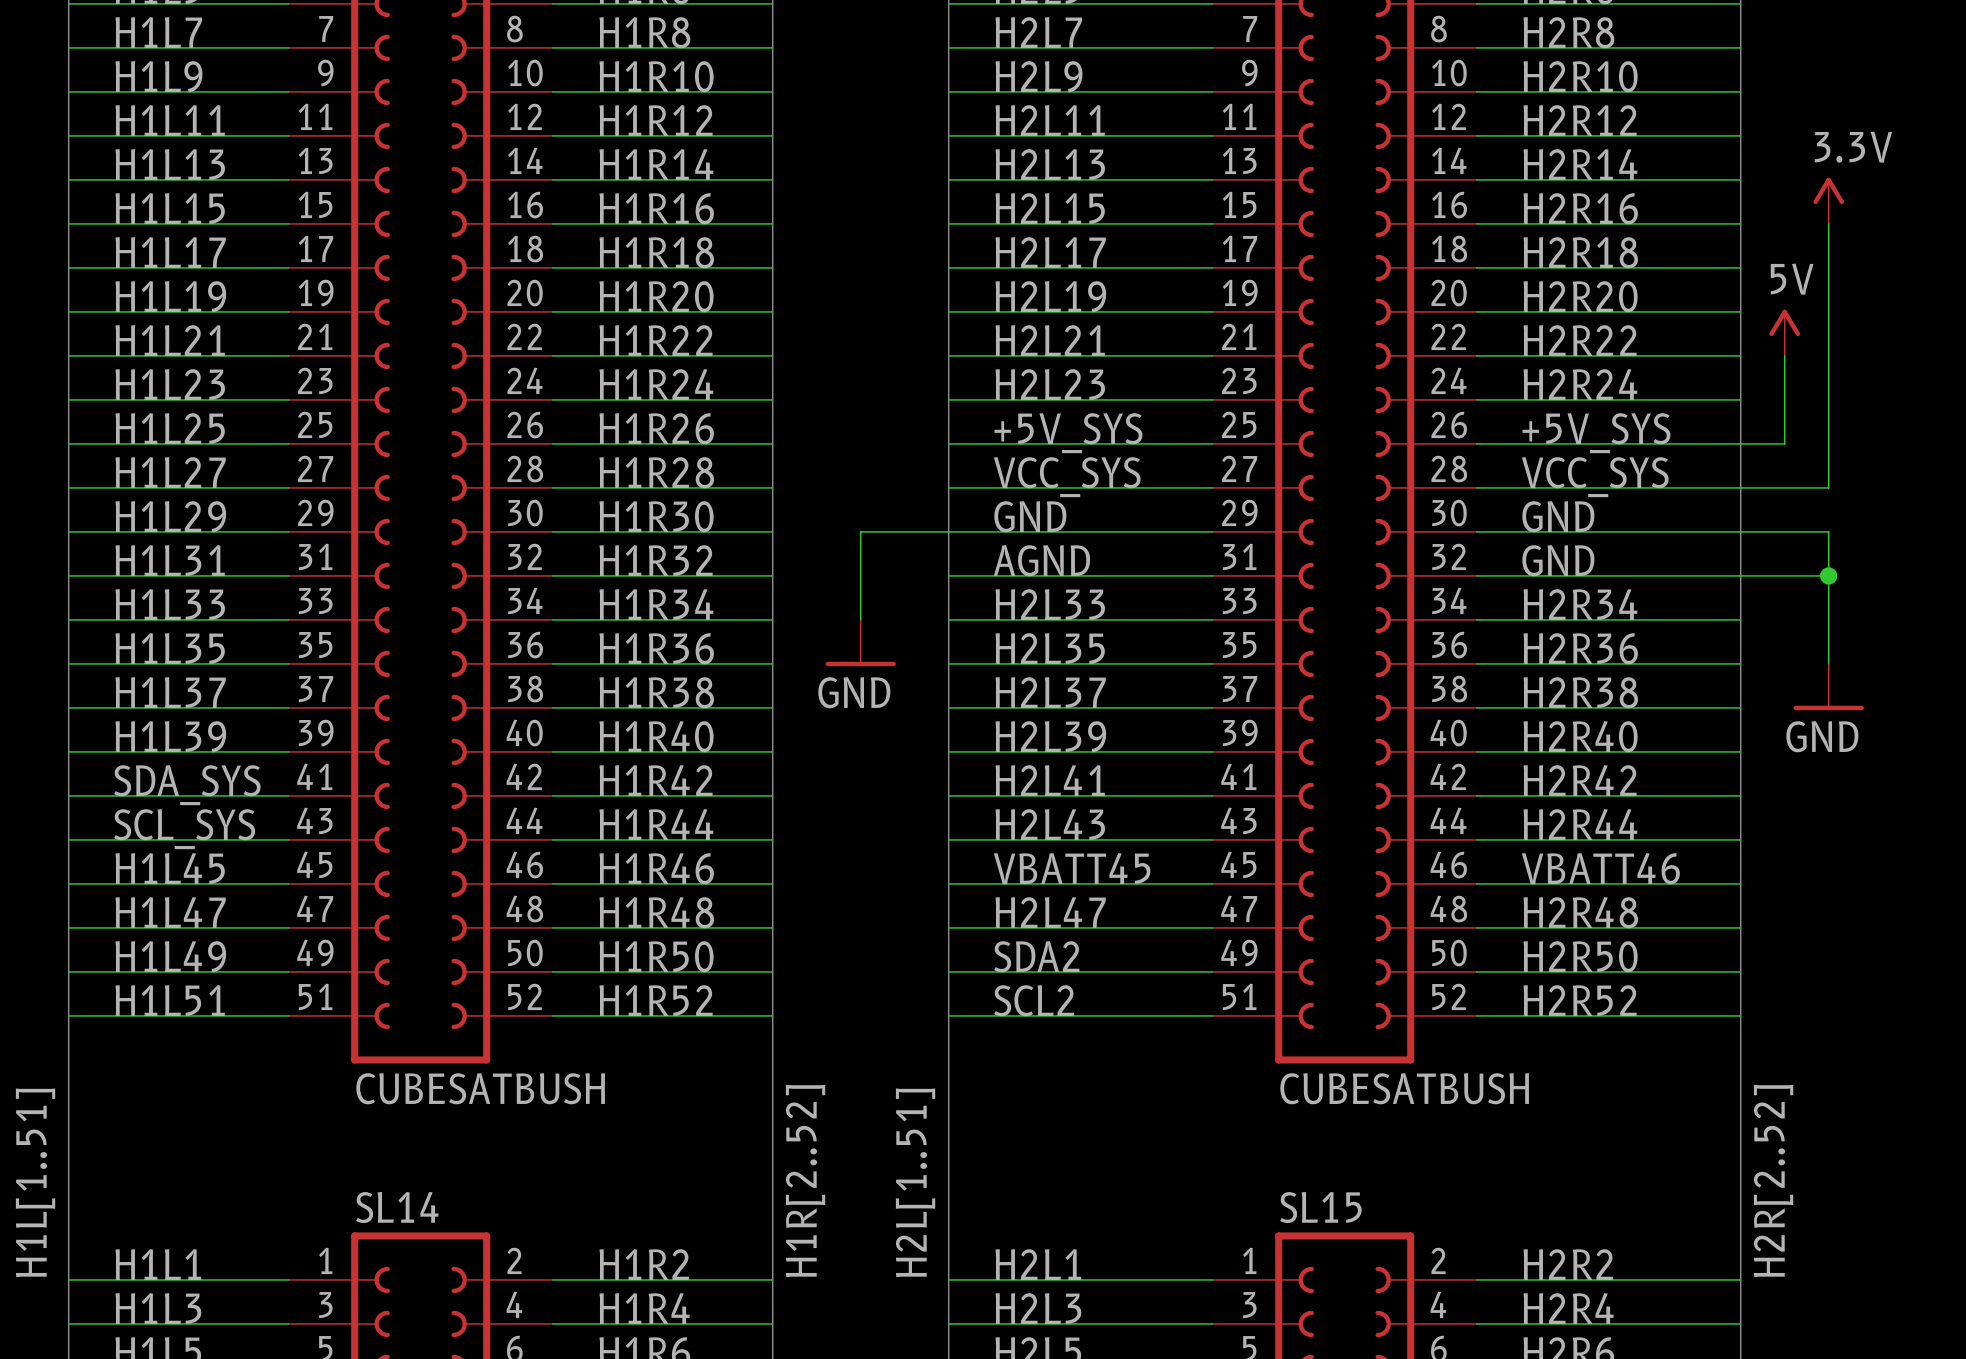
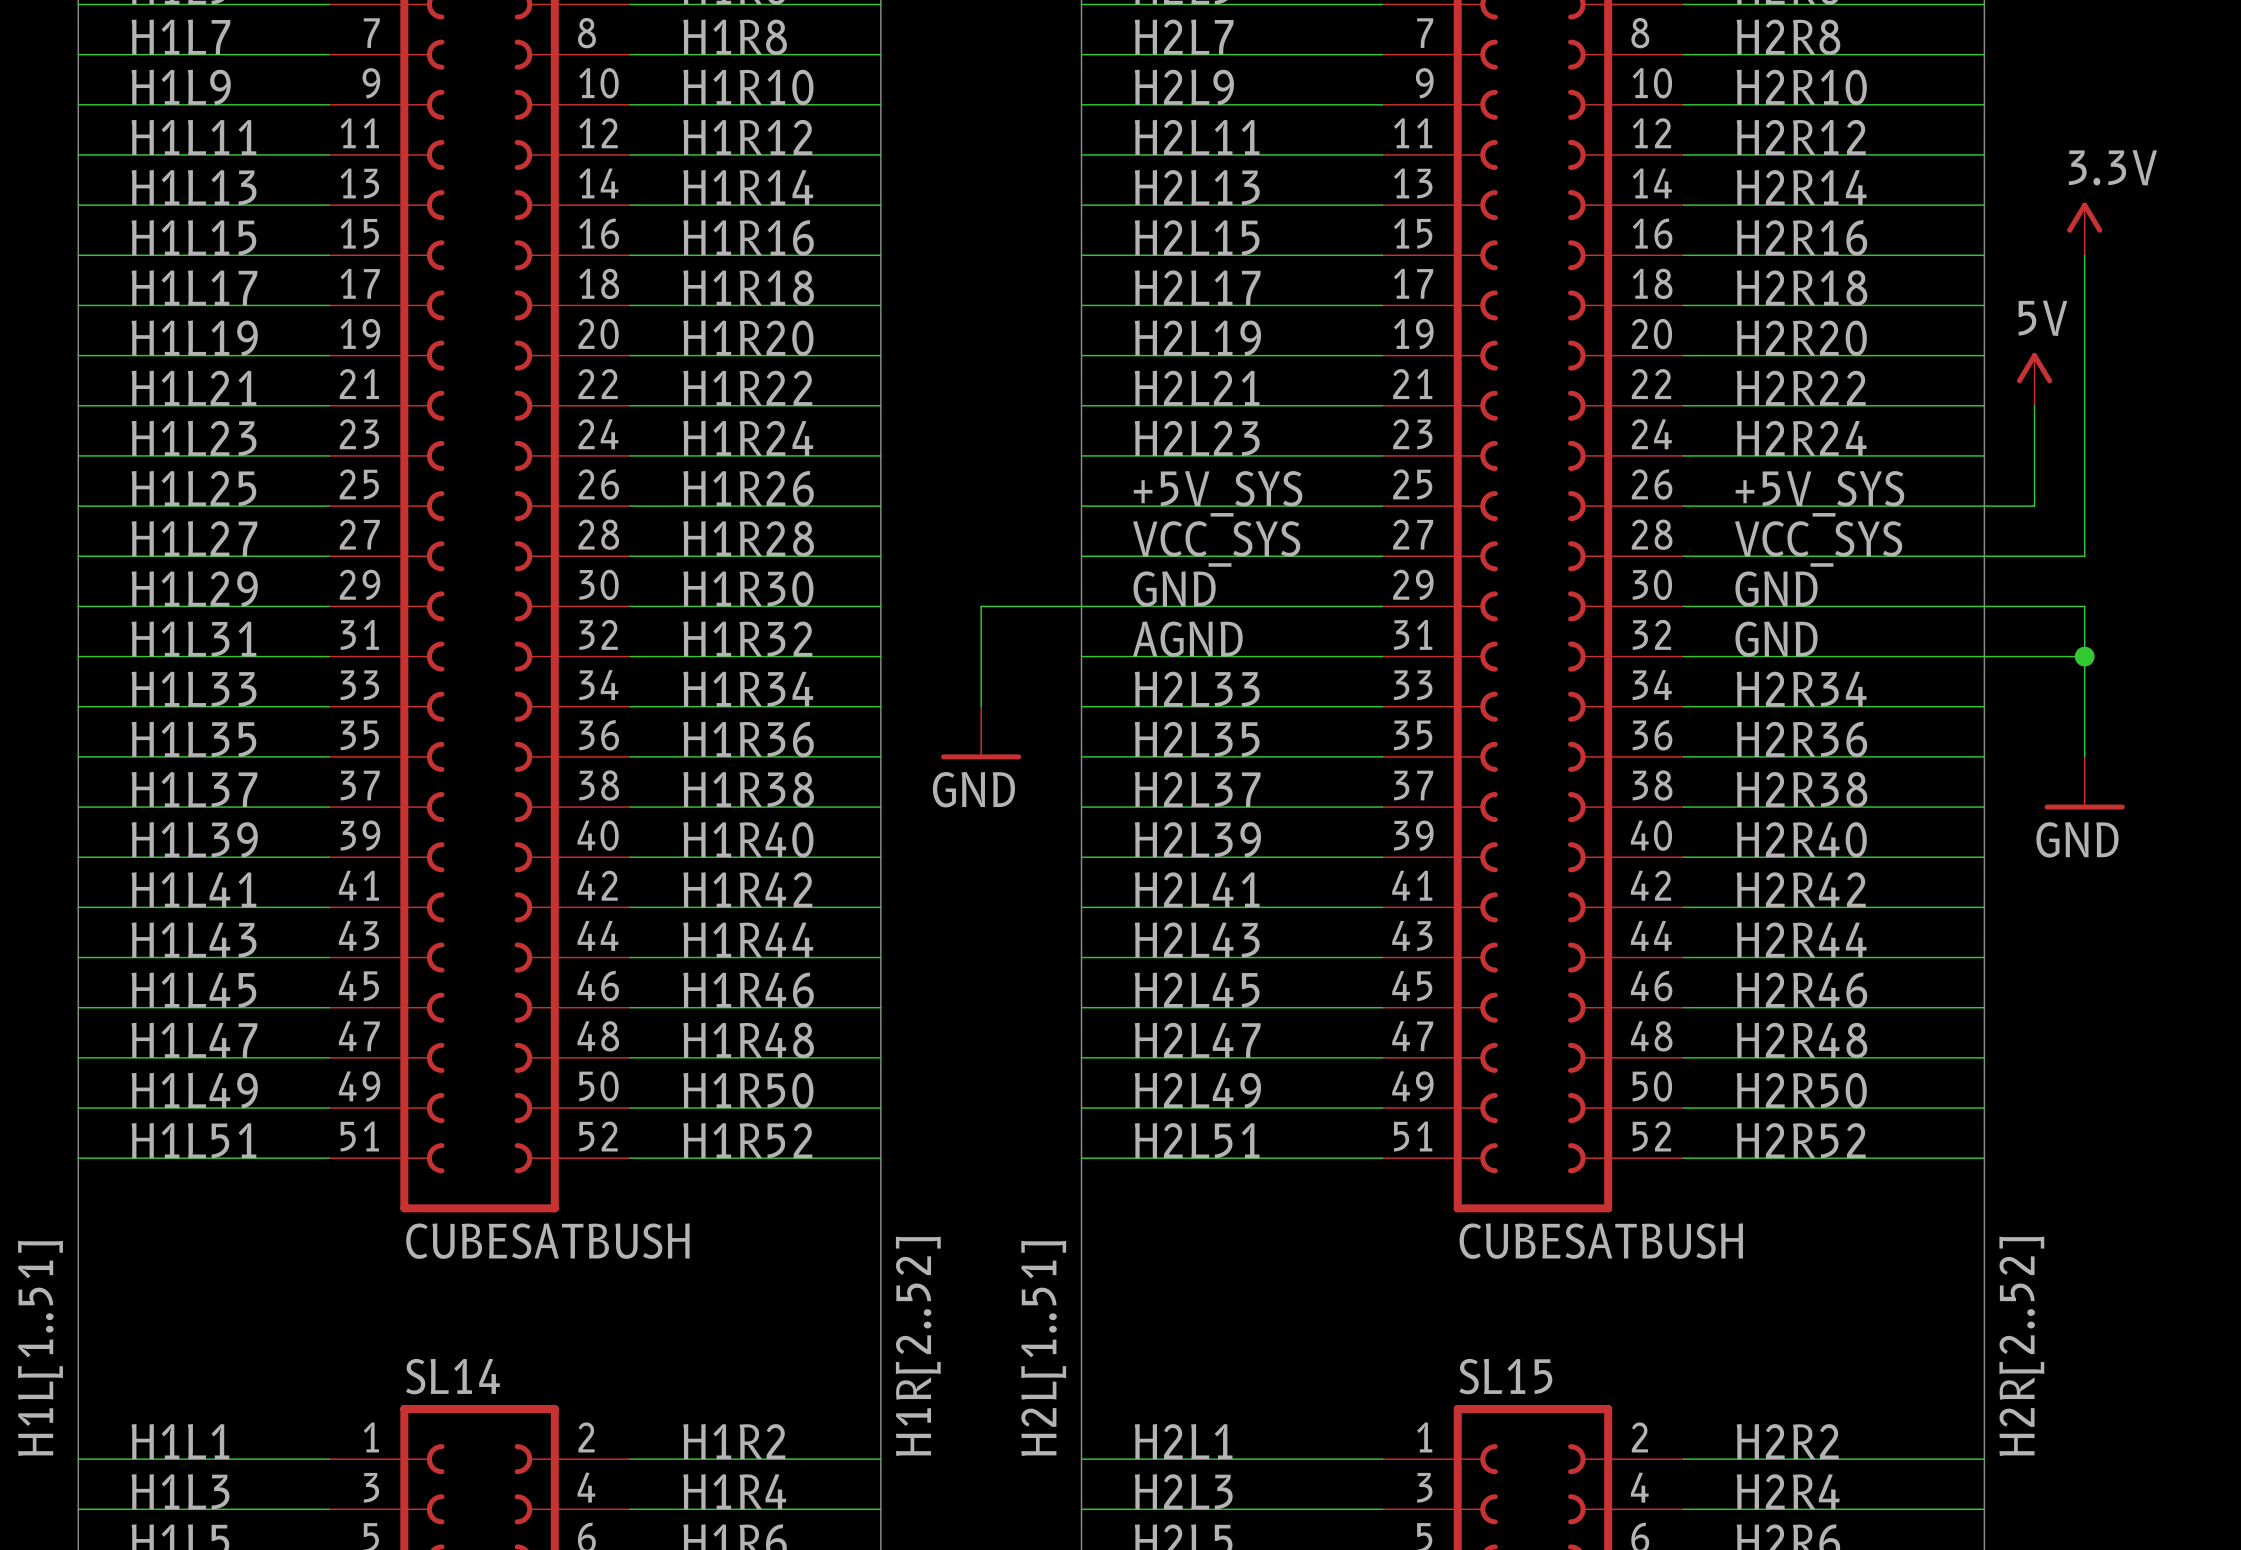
label: SDA_SYS (187, 785) -> H1L41 (193, 889)
label: SCL_SYS (184, 829) -> H1L43 (194, 939)
label: VBATT45 (1072, 868) -> H2L45 (1197, 990)
label: VBATT46 (1600, 868) -> H2R46 (1801, 990)
label: SDA2 (1036, 956) -> H2L49 (1197, 1090)
label: SCL2 (1034, 1000) -> H2L51 (1197, 1140)

